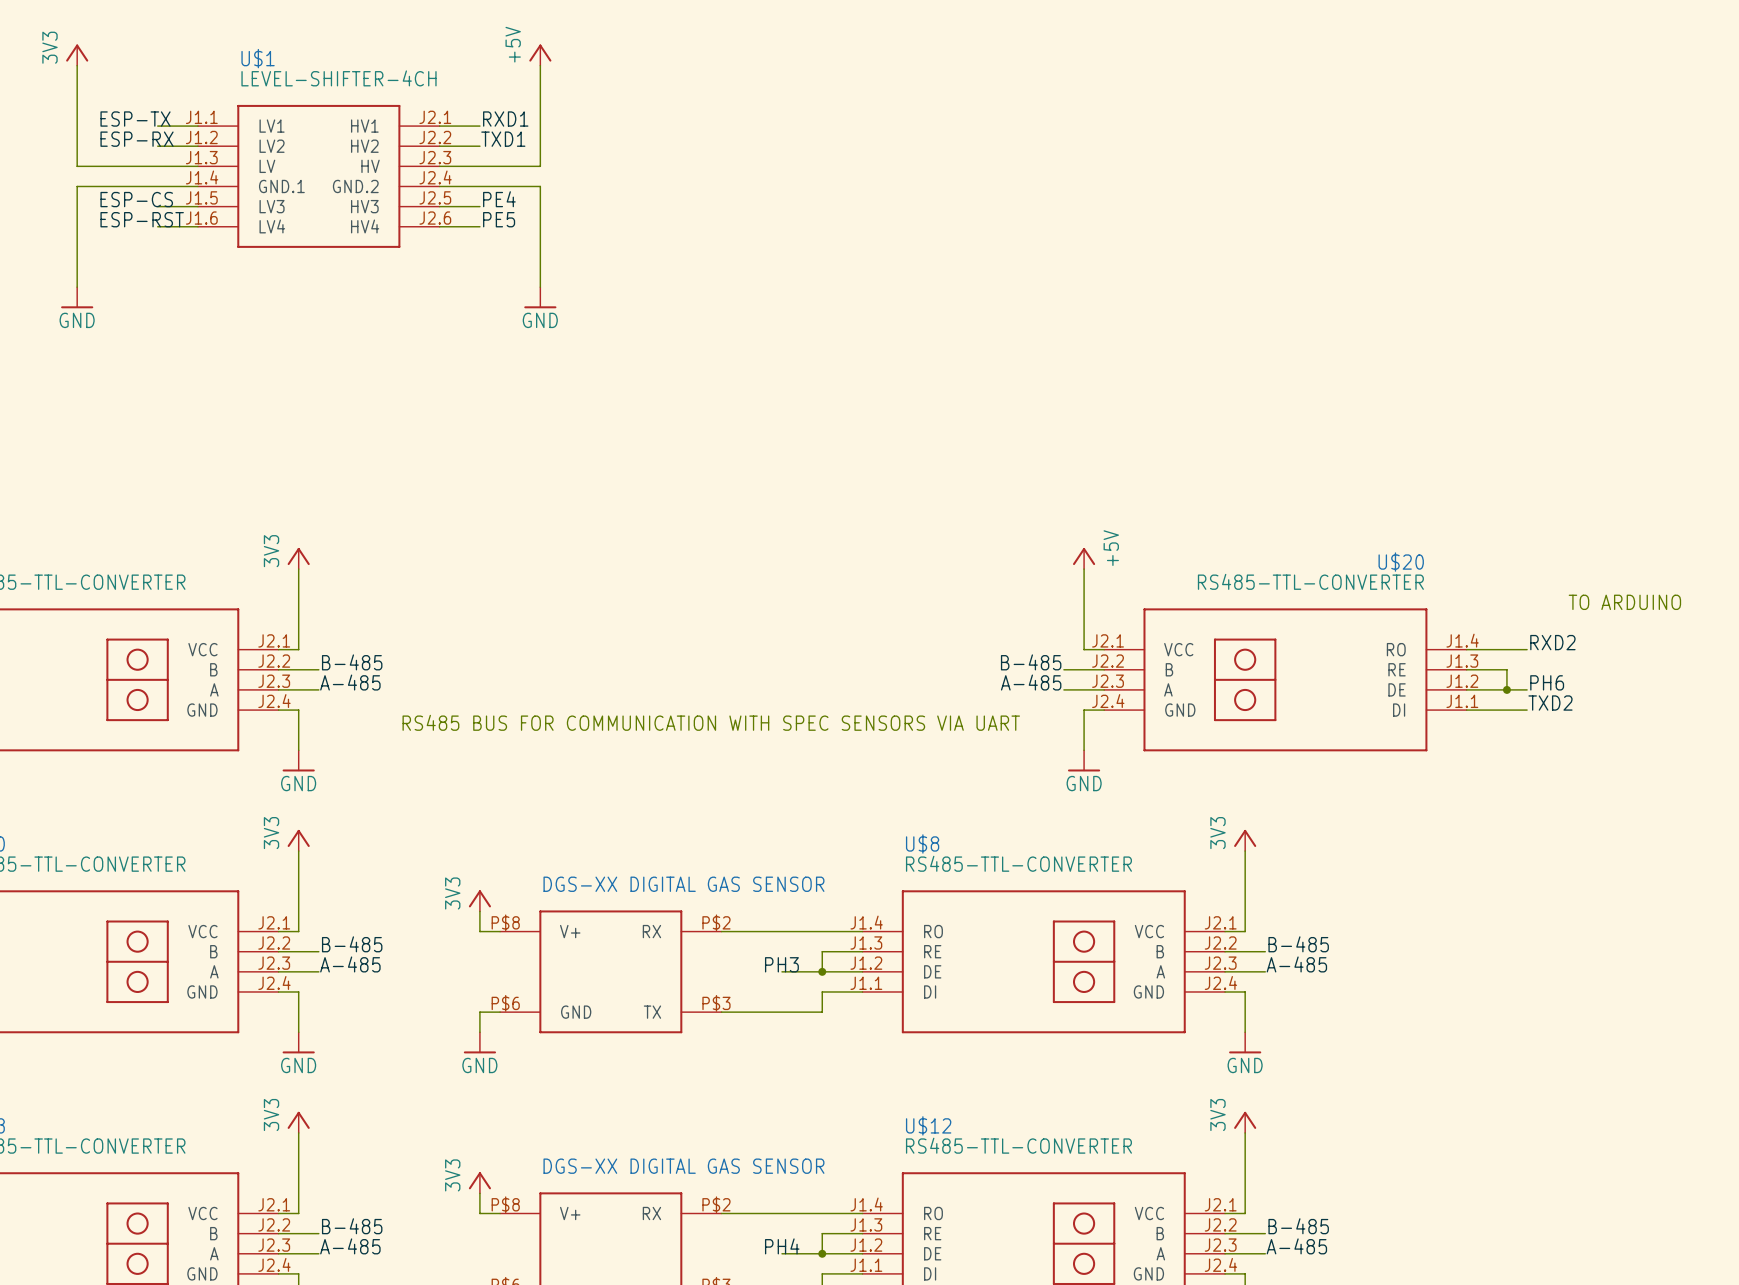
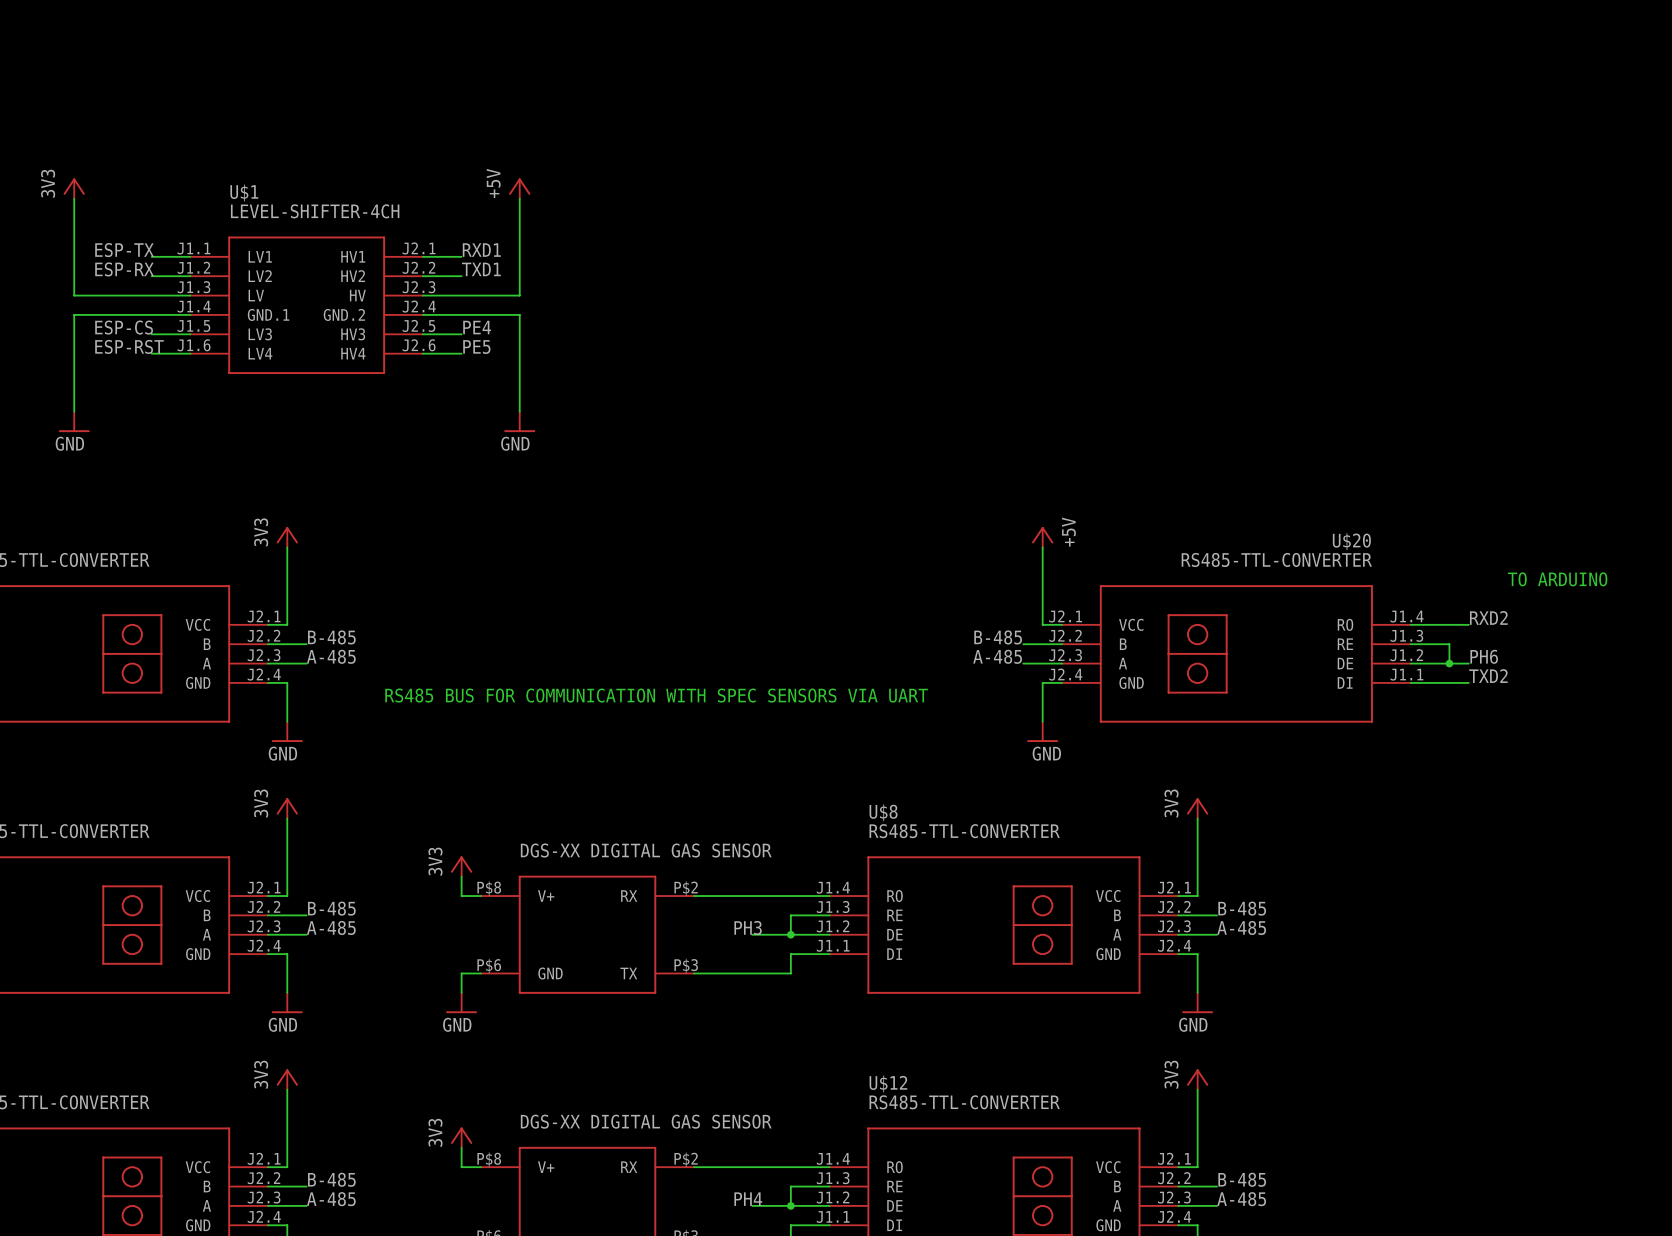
power symbol position: 3V3 (77, 55) -> 3V3 (74, 188)
power symbol position: +5V (540, 55) -> +5V (519, 188)
wire: (77, 65) (77, 166) (198, 166) -> none
wire: (540, 65) (540, 166) (439, 166) -> none
label position: ESP-TX (135, 119) -> ESP-TX (124, 250)
label position: RXD1 (505, 119) -> RXD1 (481, 250)
wire: (157, 126) (198, 126) -> (151, 256) (190, 256)
wire: (439, 126) (479, 126) -> (422, 256) (461, 256)
label position: ESP-RX (137, 139) -> ESP-RX (124, 269)
label position: TXD1 (503, 139) -> TXD1 (481, 269)
wire: (157, 146) (198, 146) -> (151, 276) (190, 276)
wire: (439, 146) (479, 146) -> (422, 276) (461, 276)
U$1 position: (318, 176) -> (306, 305)
wire: (198, 186) (77, 186) (77, 206) -> none
wire: (439, 186) (540, 186) (540, 206) -> none
label position: ESP-CS (136, 199) -> ESP-CS (124, 327)
label position: PE4 (499, 199) -> PE4 (477, 327)
wire: (157, 206) (198, 206) -> (151, 334) (190, 334)
wire: (439, 206) (479, 206) -> (422, 334) (461, 334)
label position: ESP-RST (142, 219) -> ESP-RST (129, 346)
label position: PE5 (499, 219) -> PE5 (476, 347)
wire: (157, 226) (198, 226) -> (151, 353) (190, 353)
wire: (439, 226) (479, 226) -> (422, 353) (461, 353)
wire: none -> (74, 276) (74, 295) (190, 295)
wire: none -> (519, 276) (519, 295) (422, 295)
power symbol position: GND (77, 297) -> GND (74, 421)
power symbol position: GND (540, 297) -> GND (519, 421)
wire: none -> (190, 314) (74, 314) (74, 411)
wire: none -> (422, 314) (519, 314) (519, 411)

